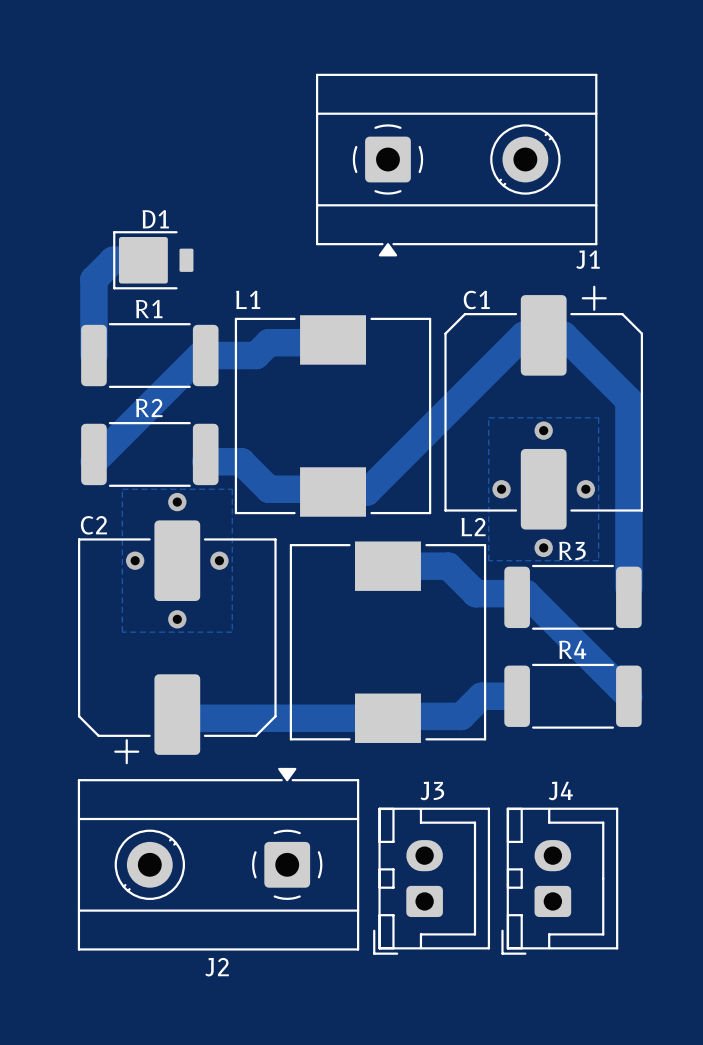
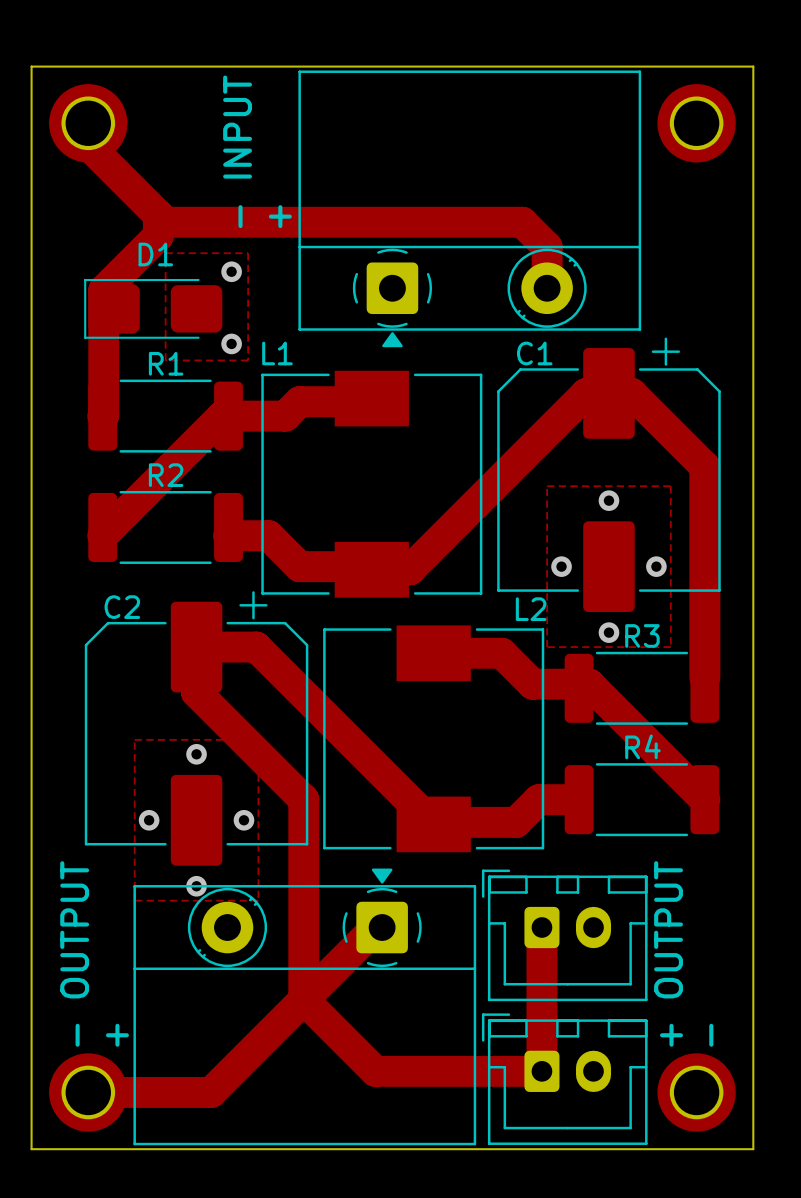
board edge: none -> (31, 66) (753, 66) (753, 1149) (31, 1149) (31, 66)
track: none -> (88, 123) (88, 144) (165, 222) (522, 222) (547, 247) (547, 288)
part: none -> (88, 123)
part: none -> (696, 123)
text: none -> - INPUT (237, 151)
J1: (456, 165) -> none
part: none -> (469, 208)
text: none -> + (280, 216)
zone outline: none -> (165, 253) (248, 253) (248, 360) (165, 360) (165, 253)
via: none -> (231, 271)
D1 footprint: [113, 231, 194, 290] -> [84, 278, 223, 339]
track: (143, 260) (113, 260) (93, 279) (93, 355) -> (158, 215) (158, 235) (103, 290) (102, 416)
via: none -> (231, 343)
zone outline: (122, 489) (232, 489) (232, 632) (122, 632) (122, 489) -> (134, 739) (258, 739) (258, 900) (134, 900) (134, 739)
via: (177, 502) -> none
via: (135, 560) -> none
via: (219, 560) -> none
via position: (177, 619) -> (196, 754)
C2 rotation: 0° (177, 642) -> 180° (196, 728)
via: none -> (149, 820)
via: none -> (243, 820)
track: (179, 718) (387, 718) -> (541, 927) (541, 1071) (375, 1071) (303, 999) (303, 799) (196, 692) (196, 647) (256, 647) (433, 824)
via: none -> (196, 886)
track: none -> (382, 927) (375, 927) (210, 1092) (88, 1092)
part: none -> (564, 935)
text: none -> + OUTPUT (668, 953)
text: none -> - OUTPUT (74, 953)
J2: (218, 859) -> none
part: none -> (304, 1006)
J3: (431, 881) -> none
J4: (559, 881) -> none
text: none -> + (117, 1035)
text: none -> - (711, 1035)
part: none -> (564, 1079)
part: none -> (88, 1092)
part: none -> (696, 1092)

